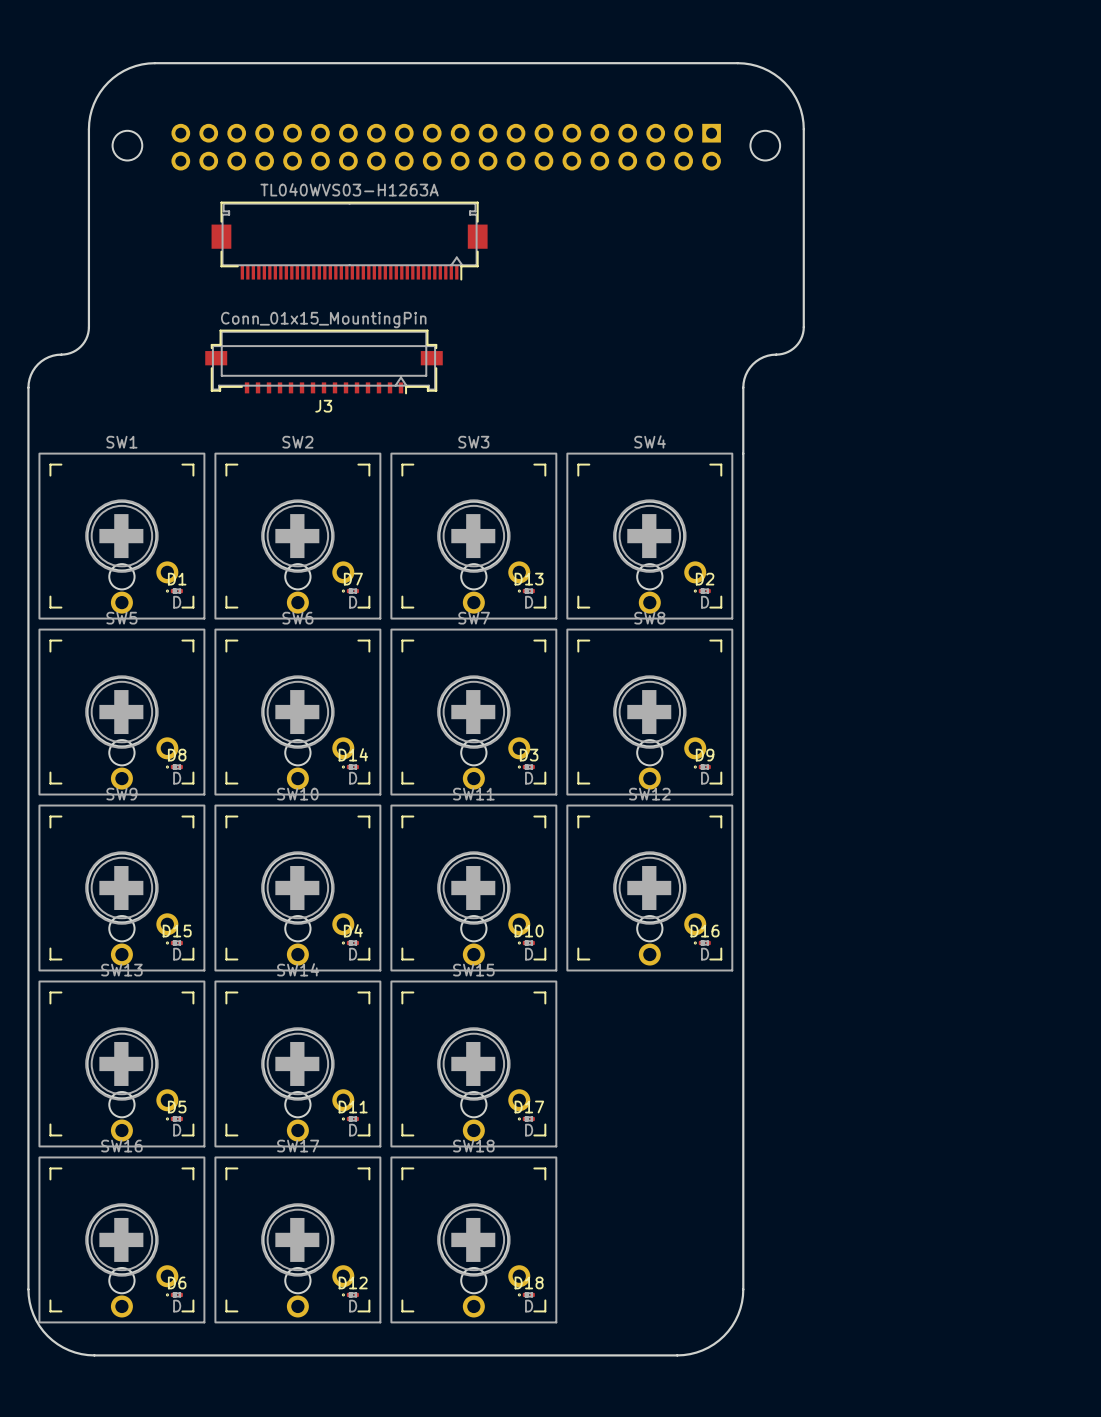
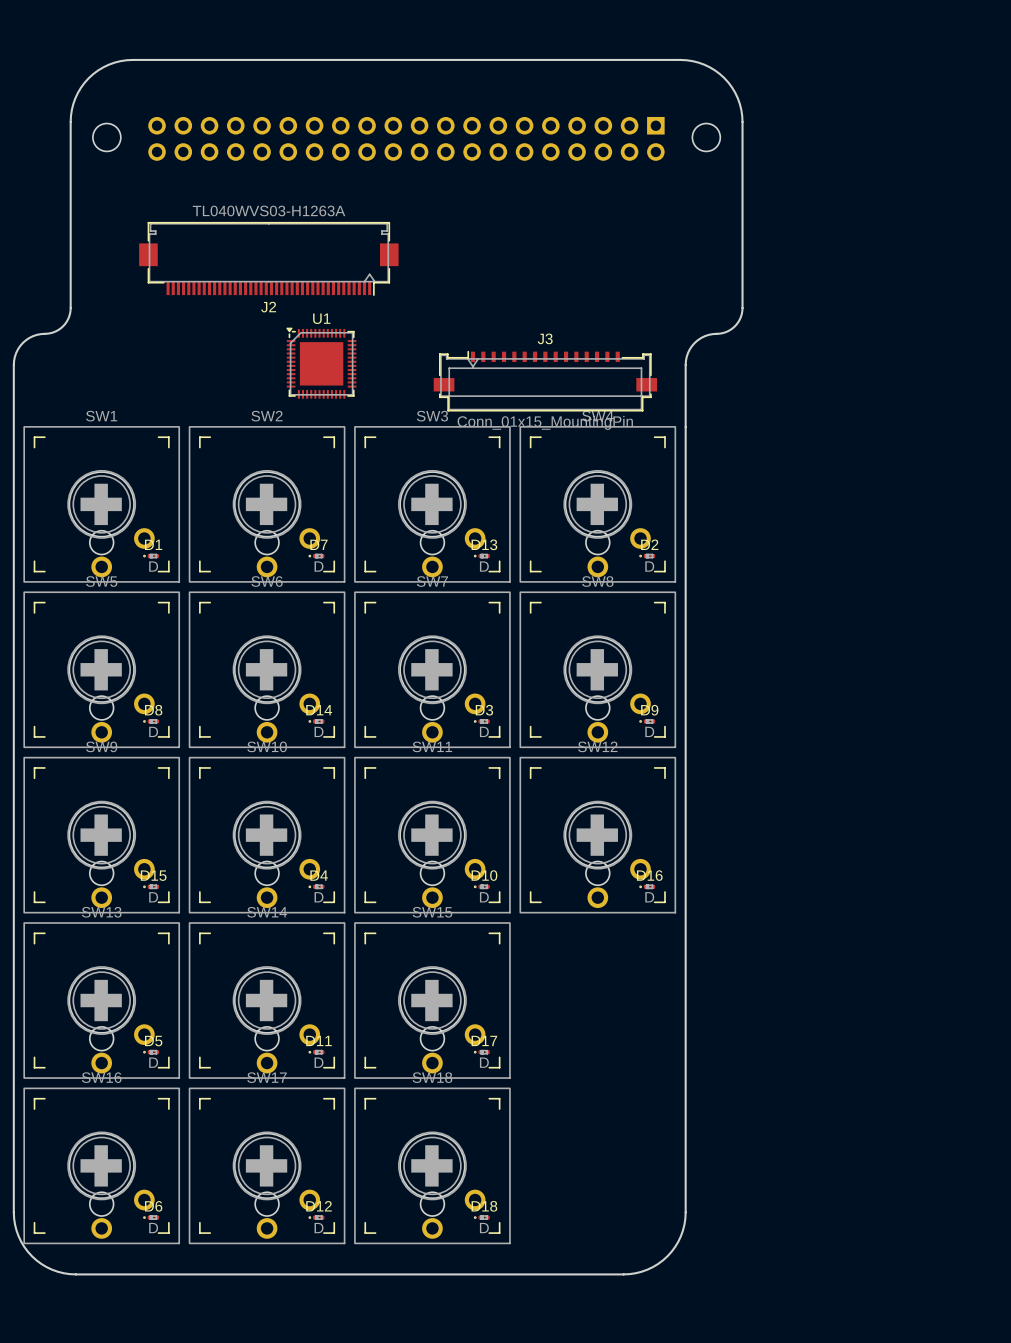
part: TL040WVS03-H1263A (349, 241) -> none
J2: none -> TL040WVS03-H1263A (268, 258)
J3 rotation: 0° (324, 361) -> 180° (545, 381)
J3 position: (324, 361) -> (545, 381)
U1: none -> (321, 363)

